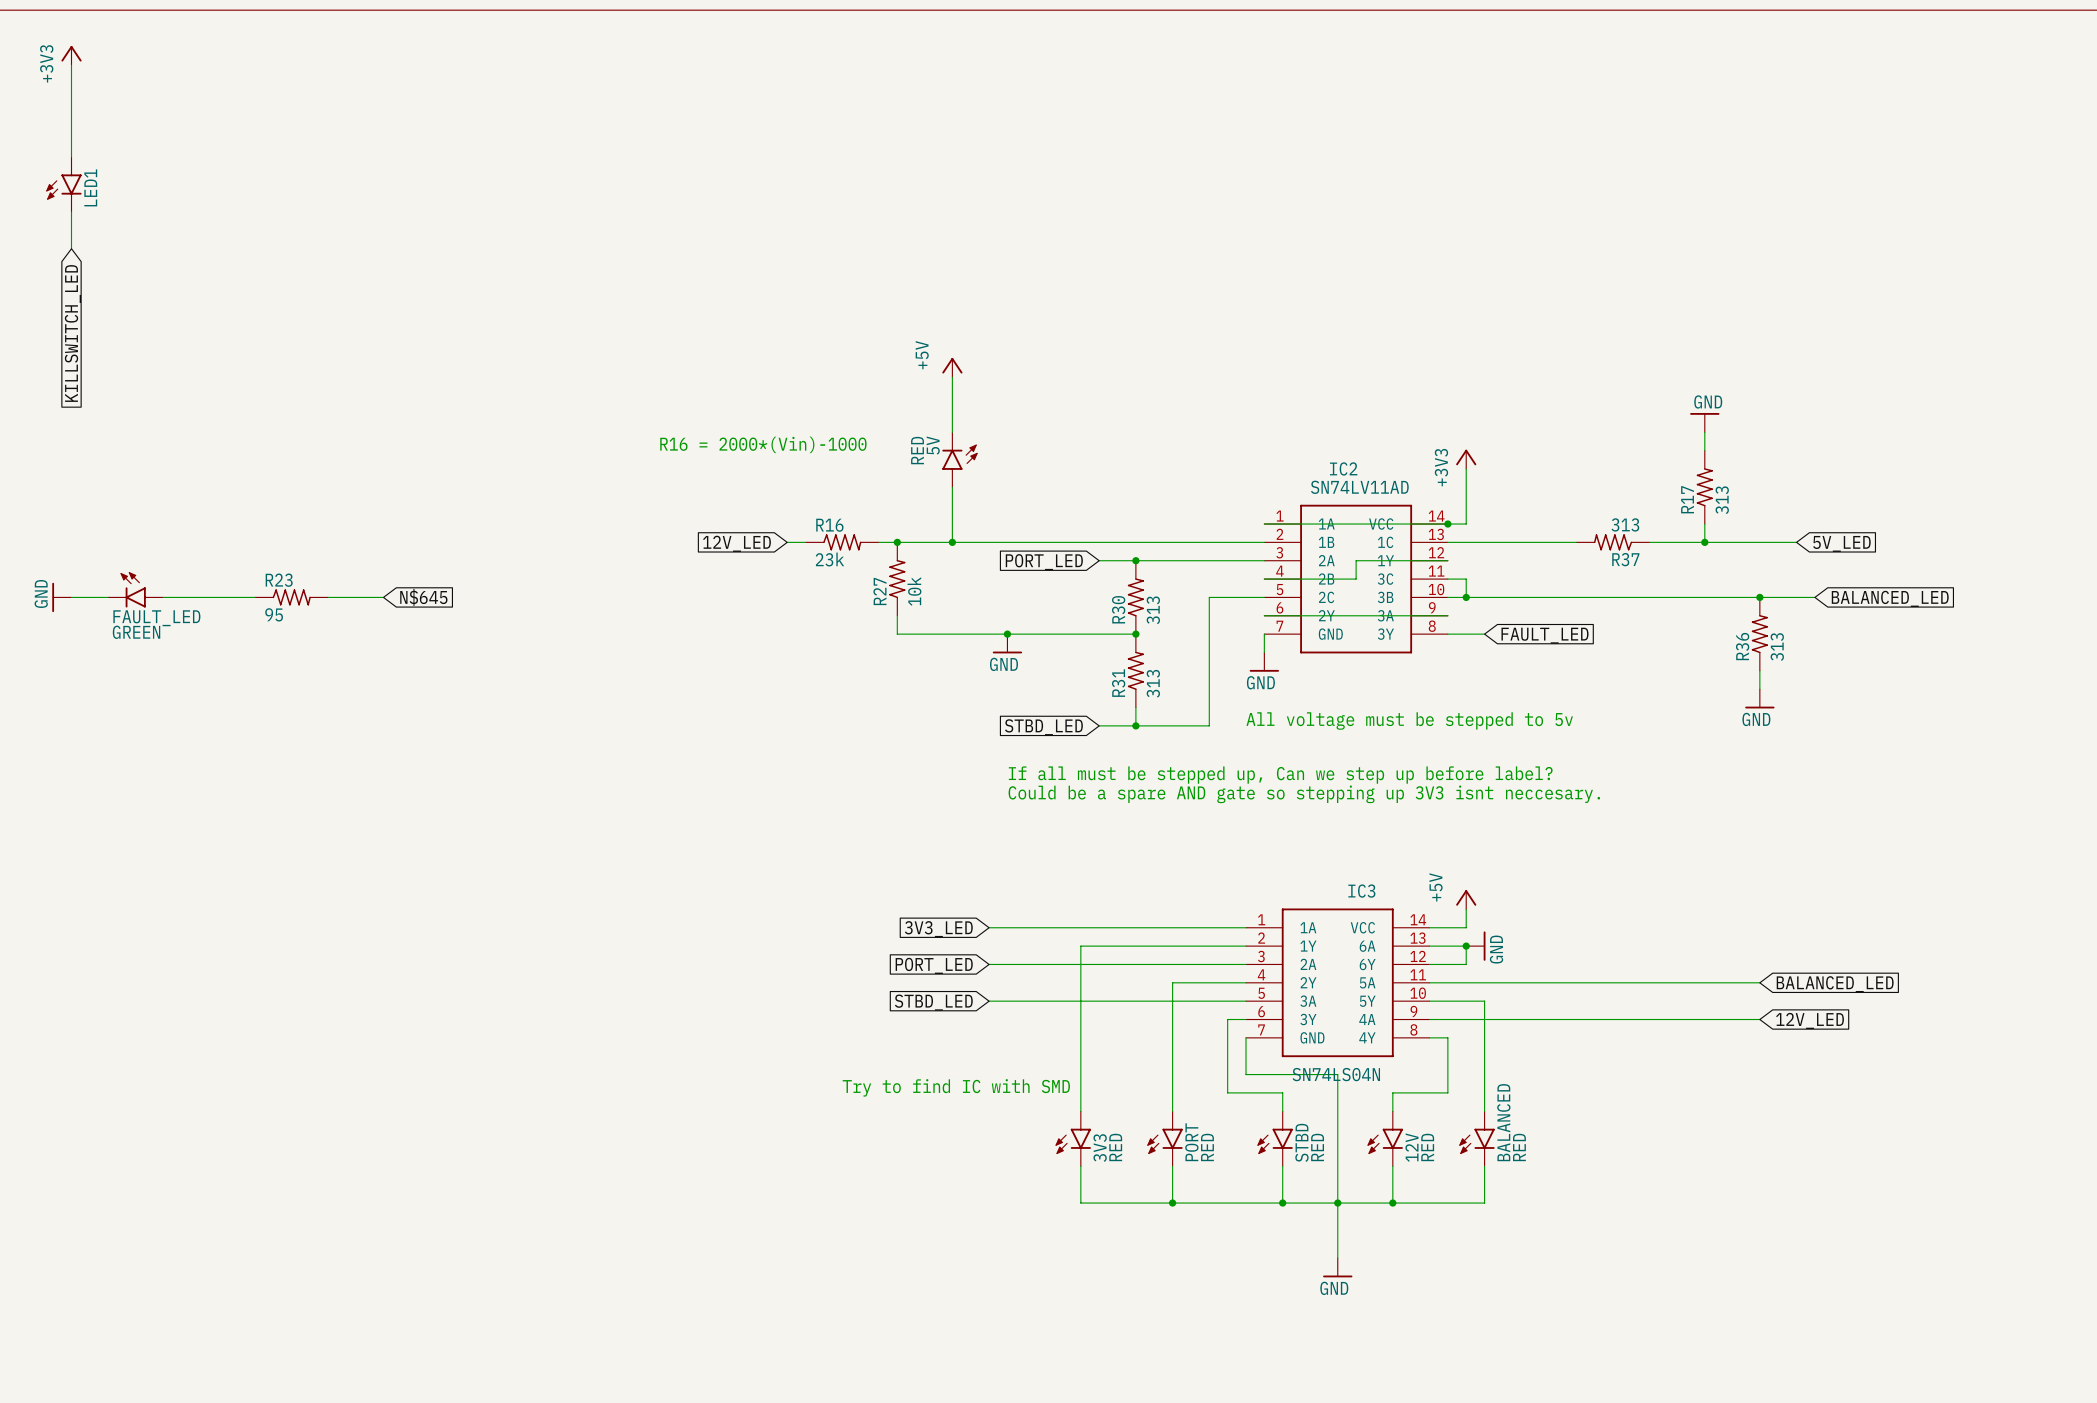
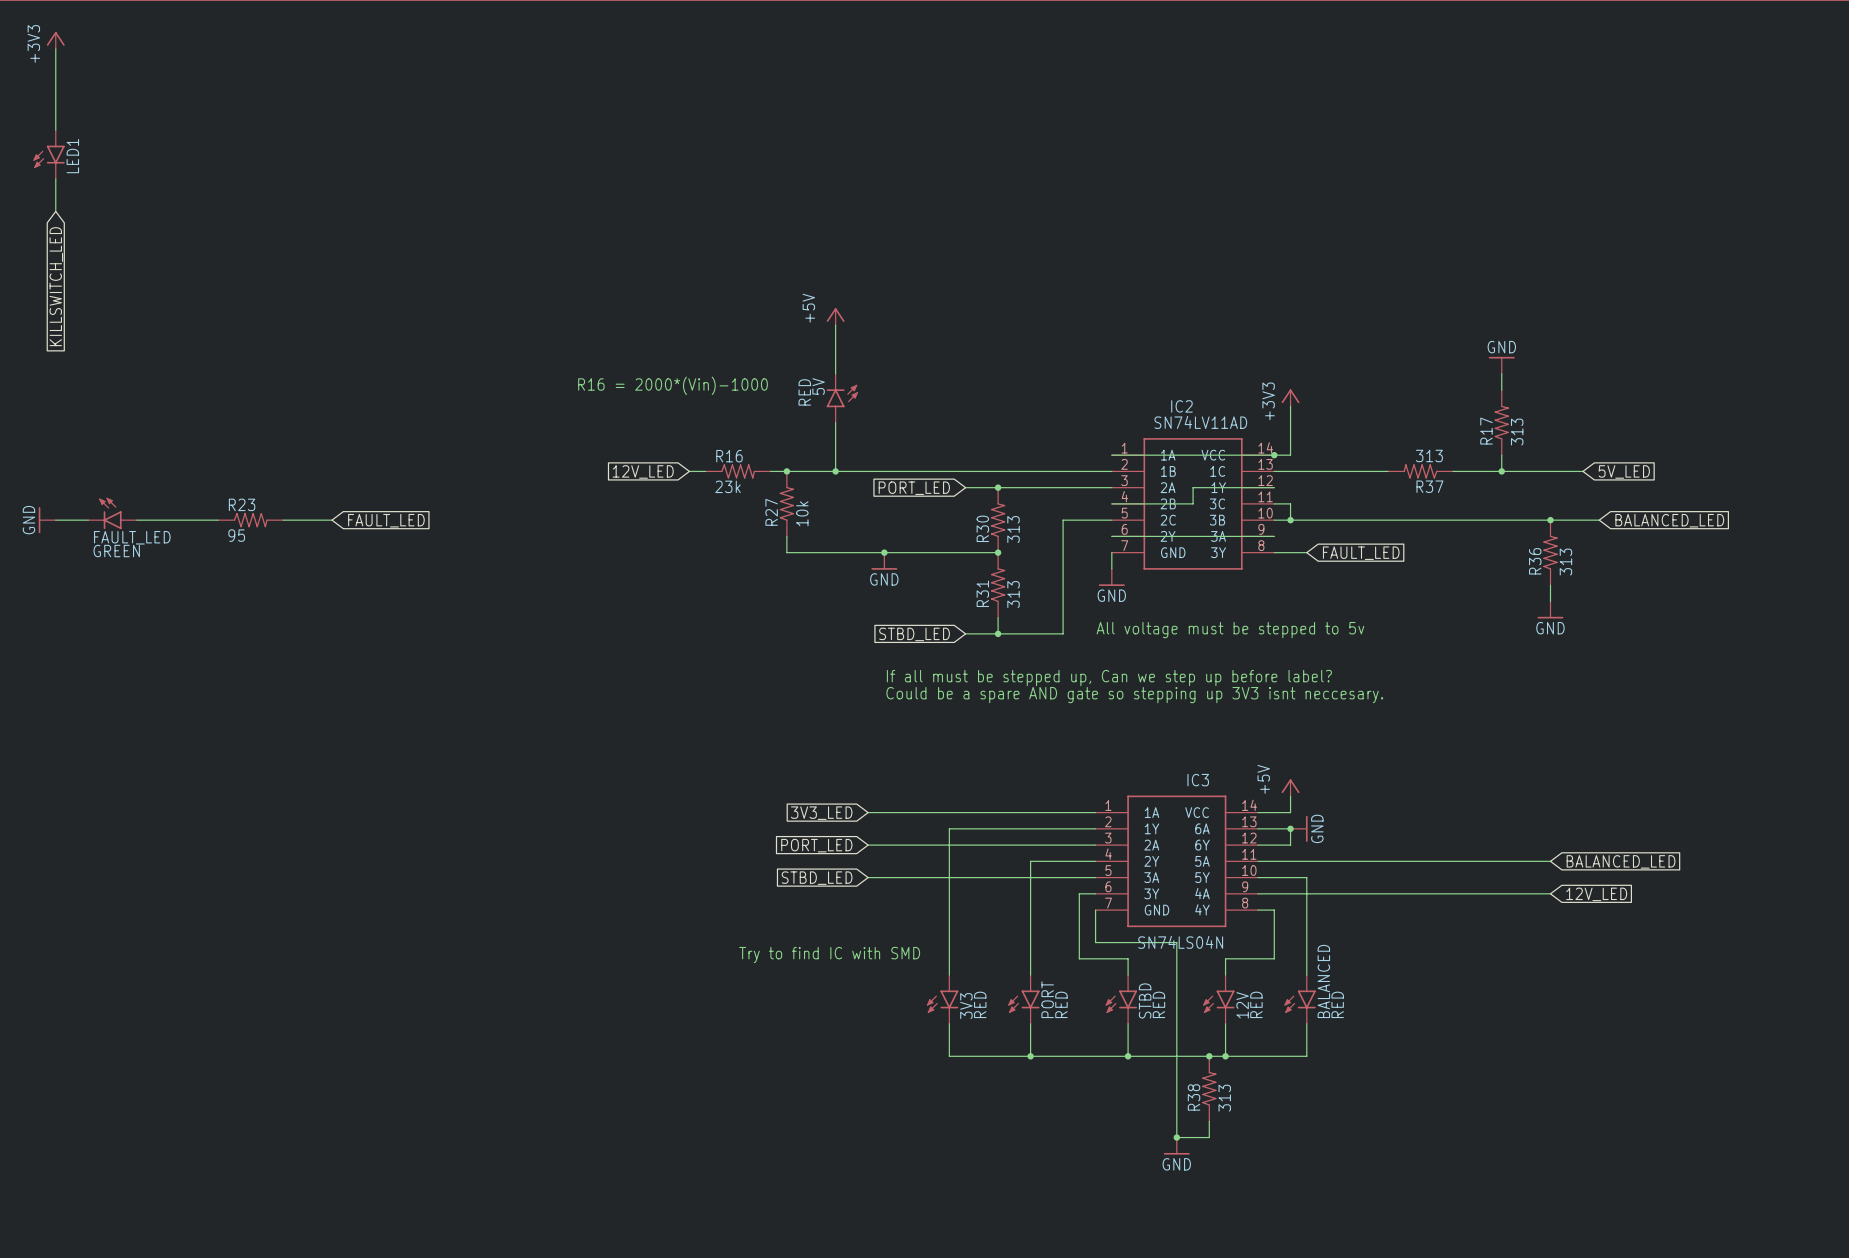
global label: N$645 (423, 597) -> FAULT_LED (386, 520)
junction position: (1337, 1203) -> (1209, 1056)
R38: none -> 313 (1209, 1088)
wire: none -> (1176, 1105) (1176, 1137) (1209, 1137) (1209, 1121)
power symbol position: GND (1337, 1267) -> GND (1176, 1146)
junction: none -> (1176, 1137)

